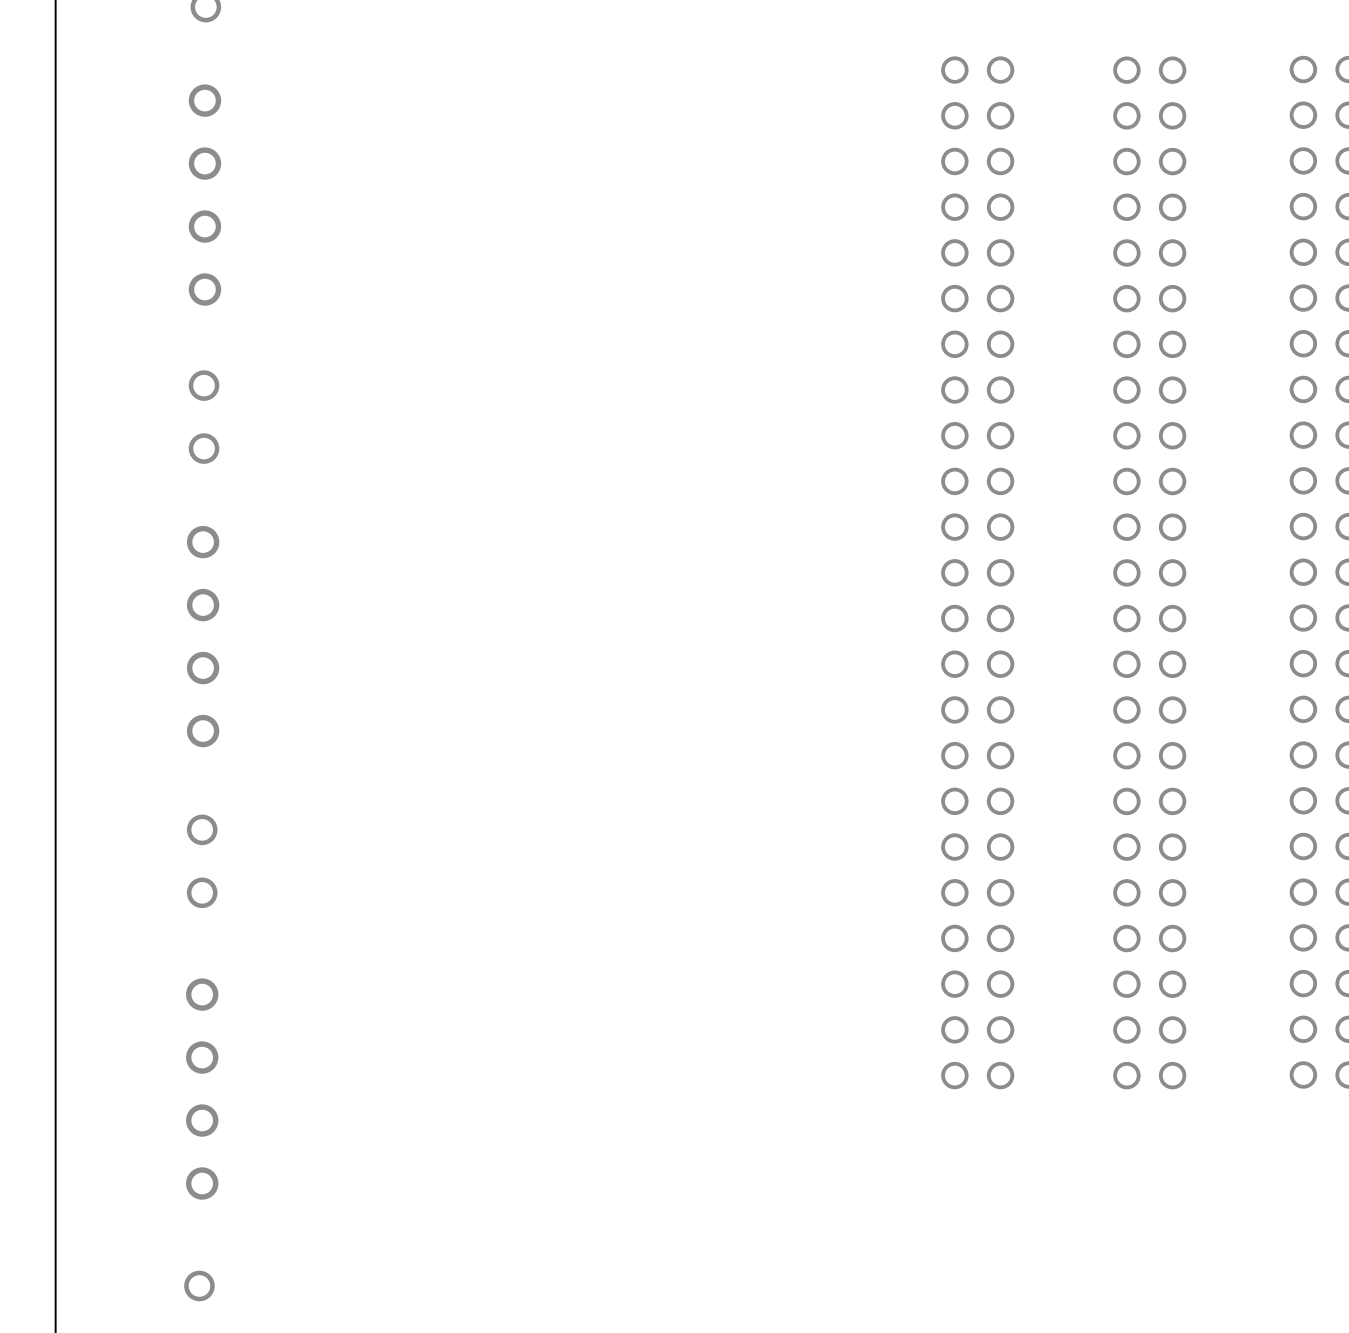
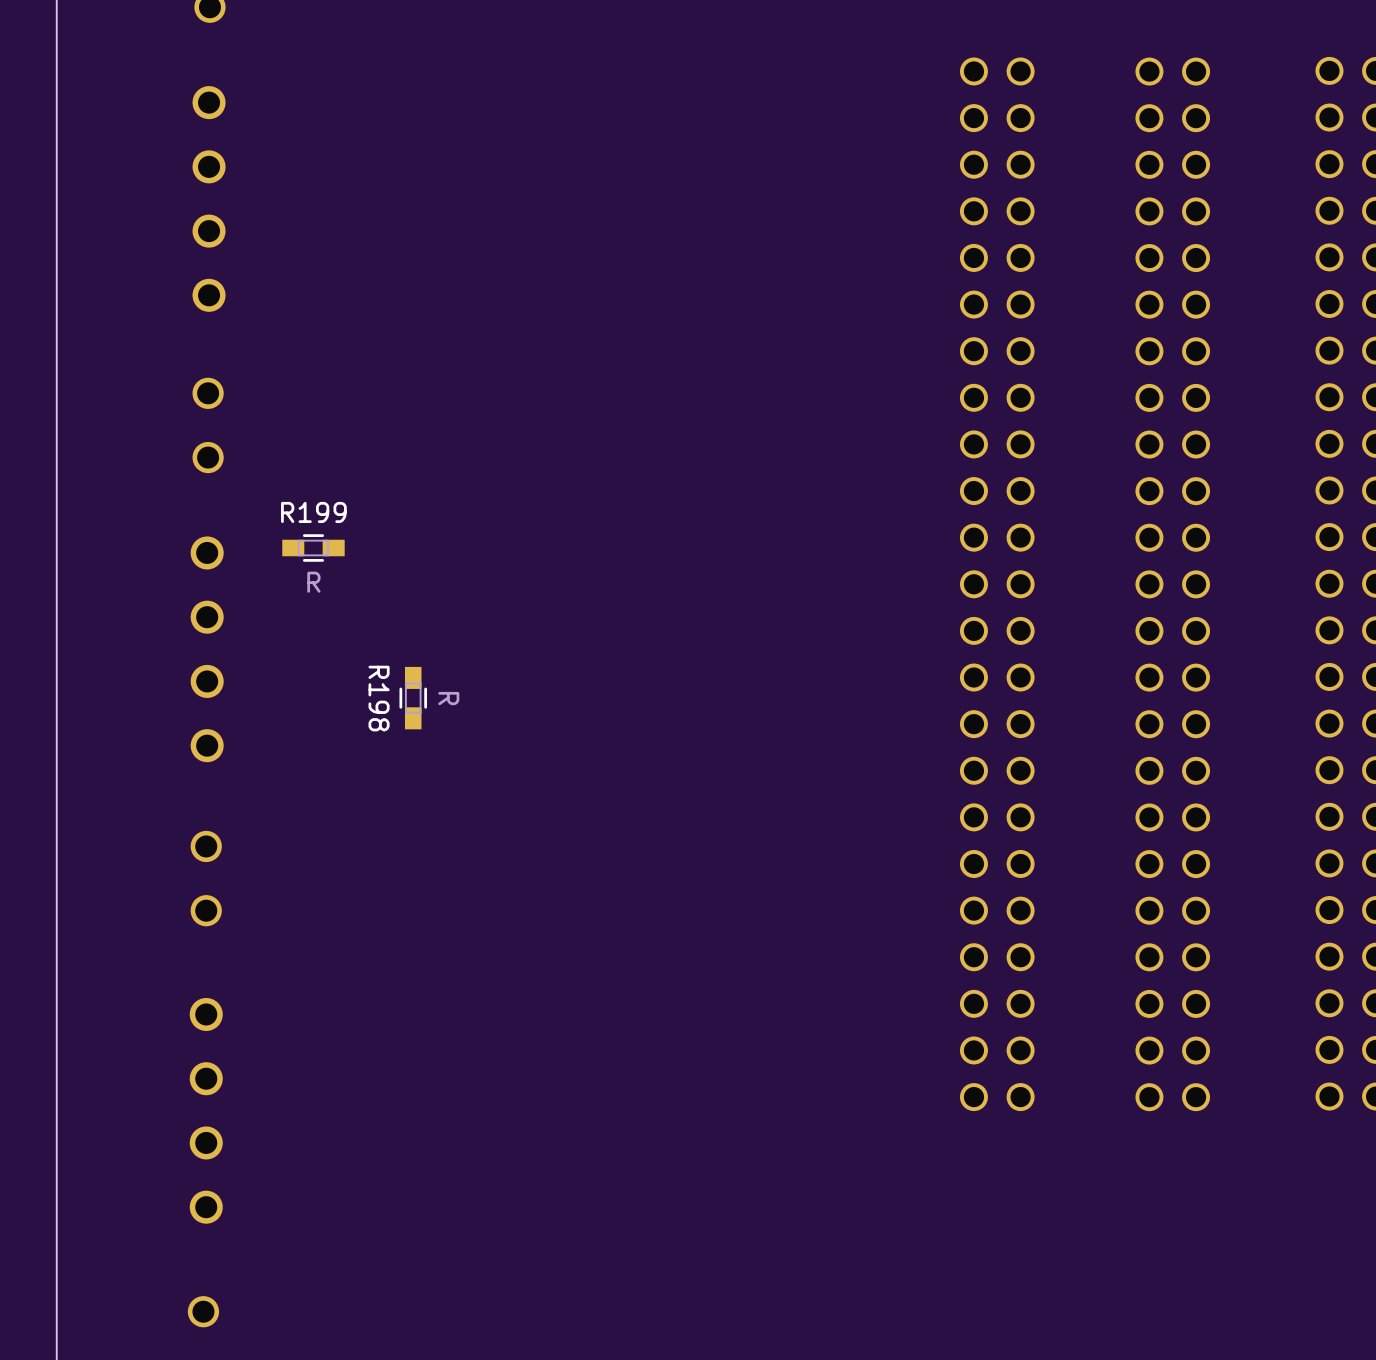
R199: none -> R (313, 548)
R198: none -> R (413, 698)

